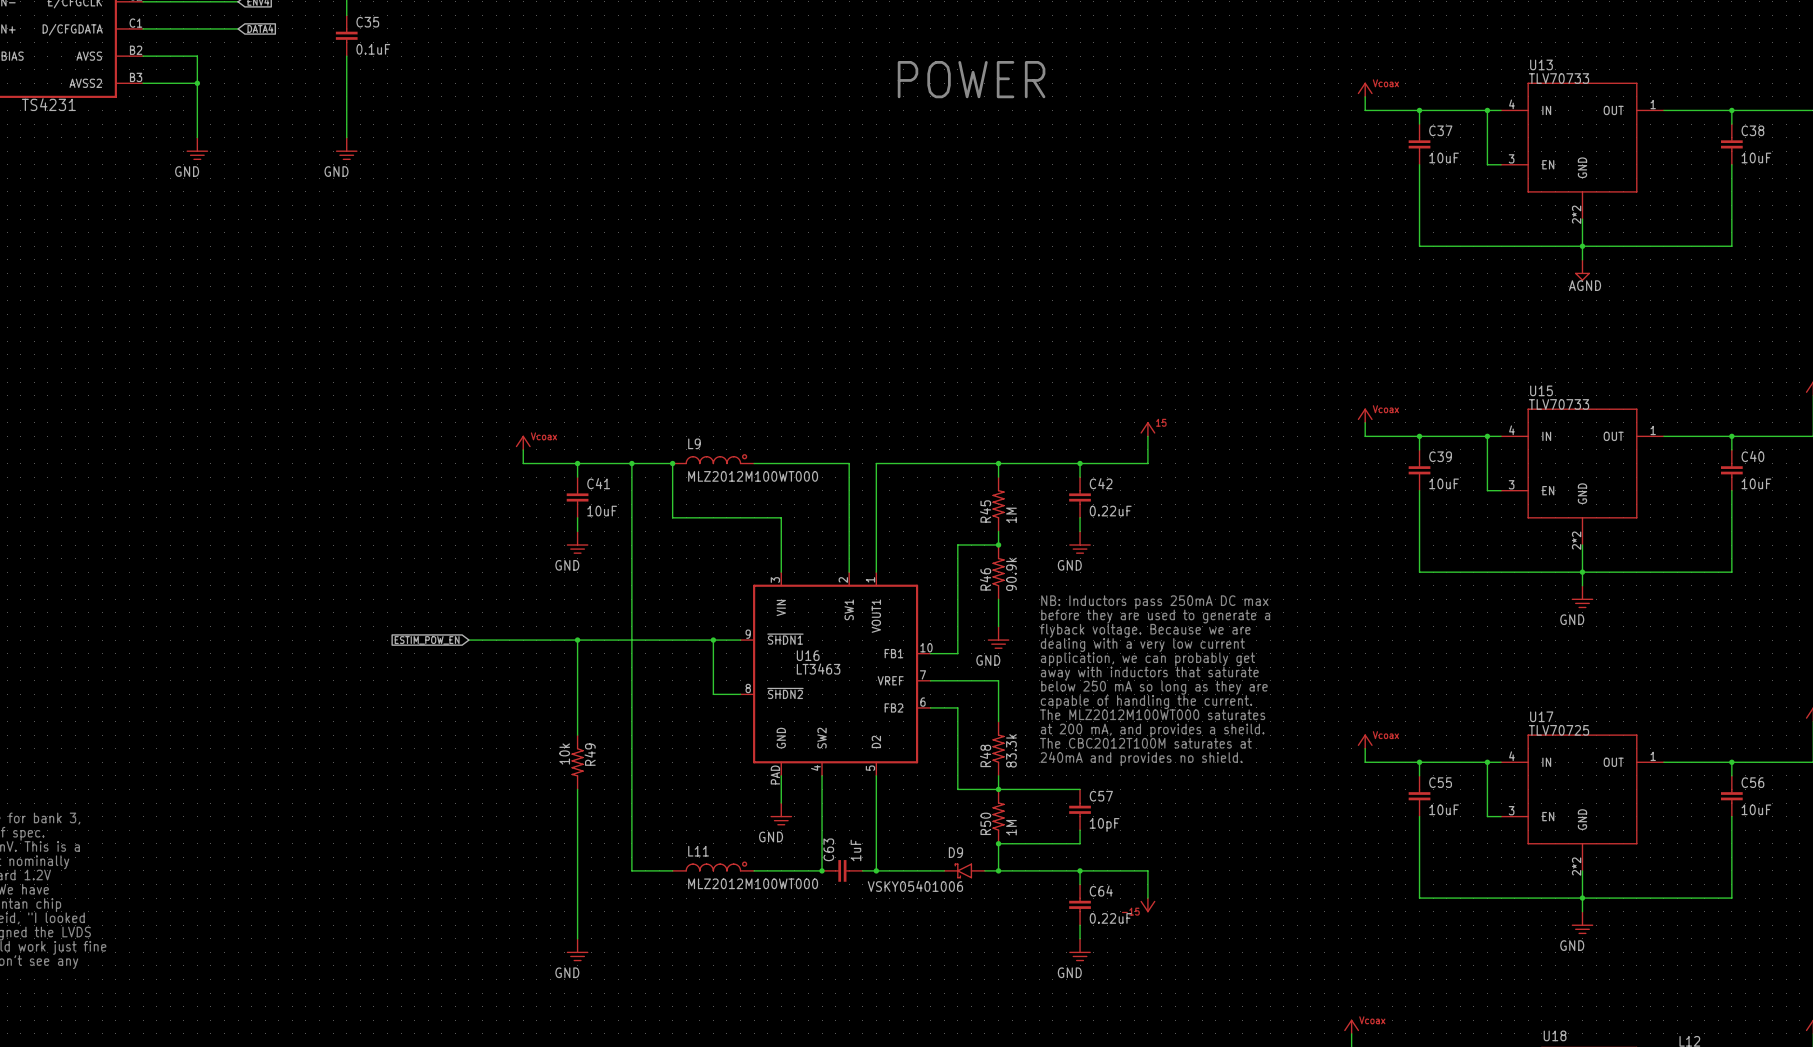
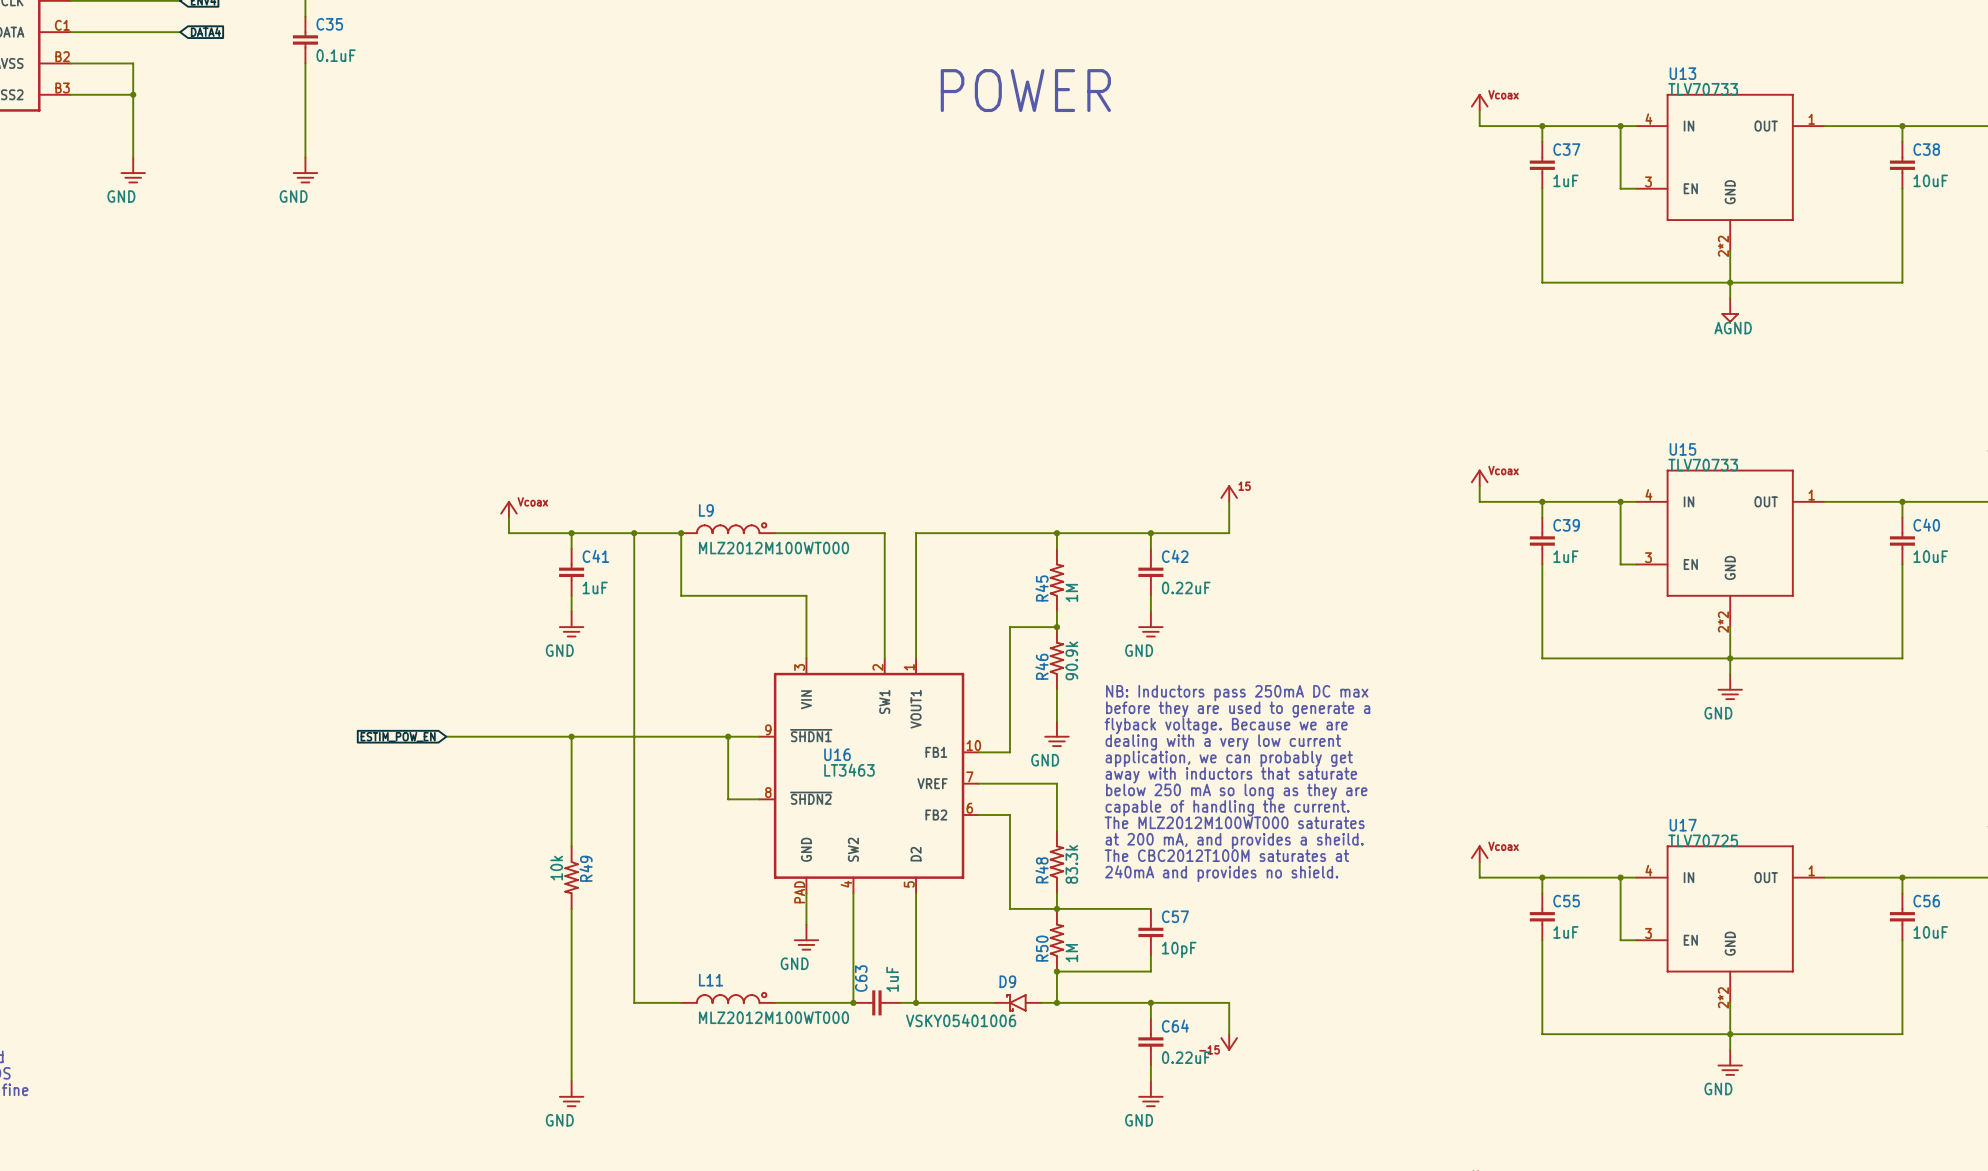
C37 value: 10uF (1444, 157) -> 1uF (1565, 180)
C39 value: 10uF (1444, 483) -> 1uF (1565, 556)
C41 value: 10uF (602, 511) -> 1uF (595, 587)
C55 value: 10uF (1444, 809) -> 1uF (1565, 932)

